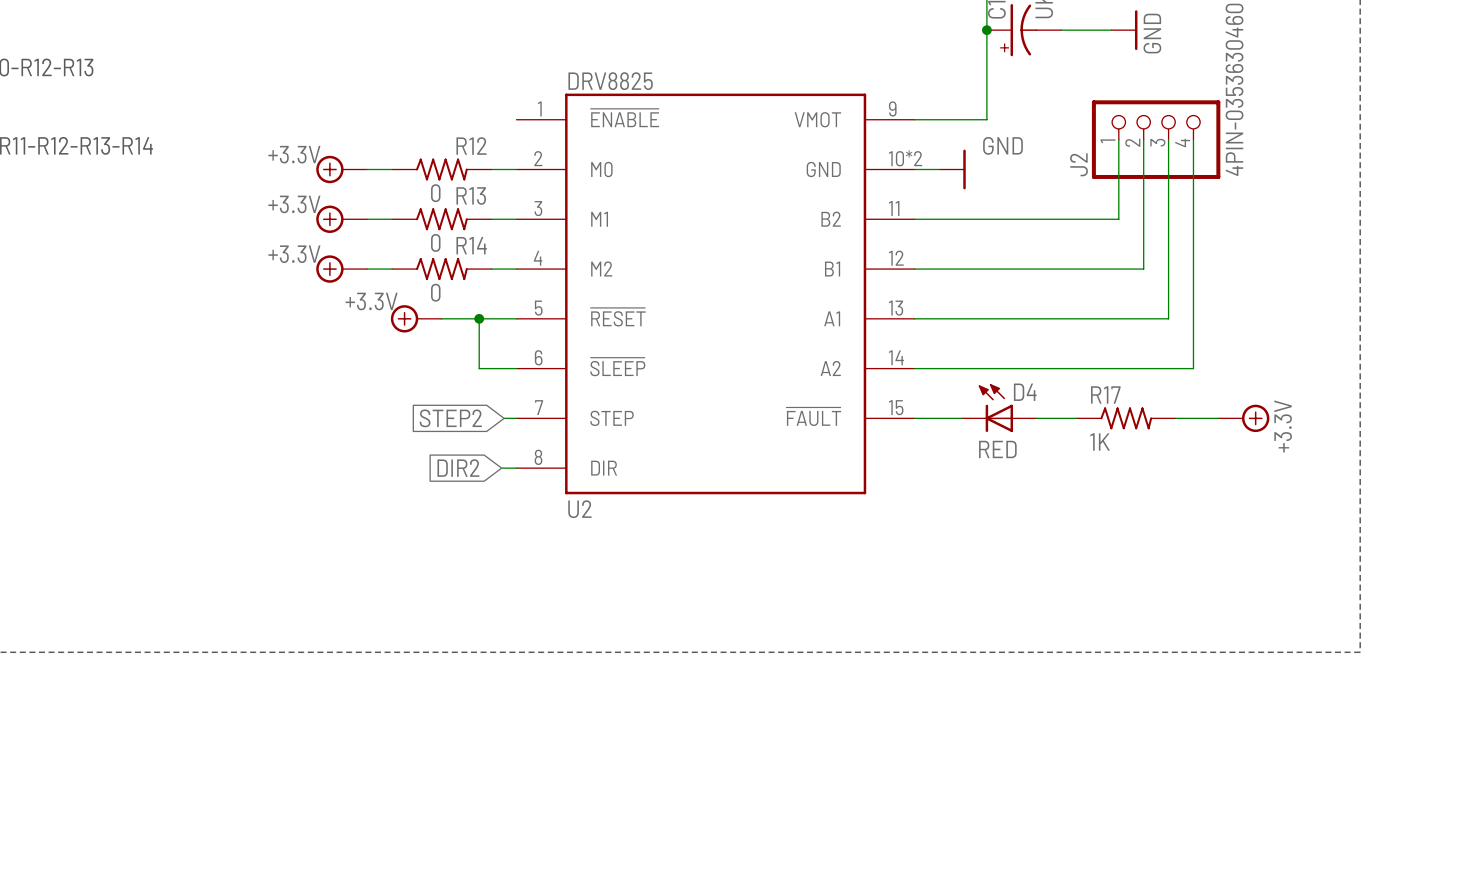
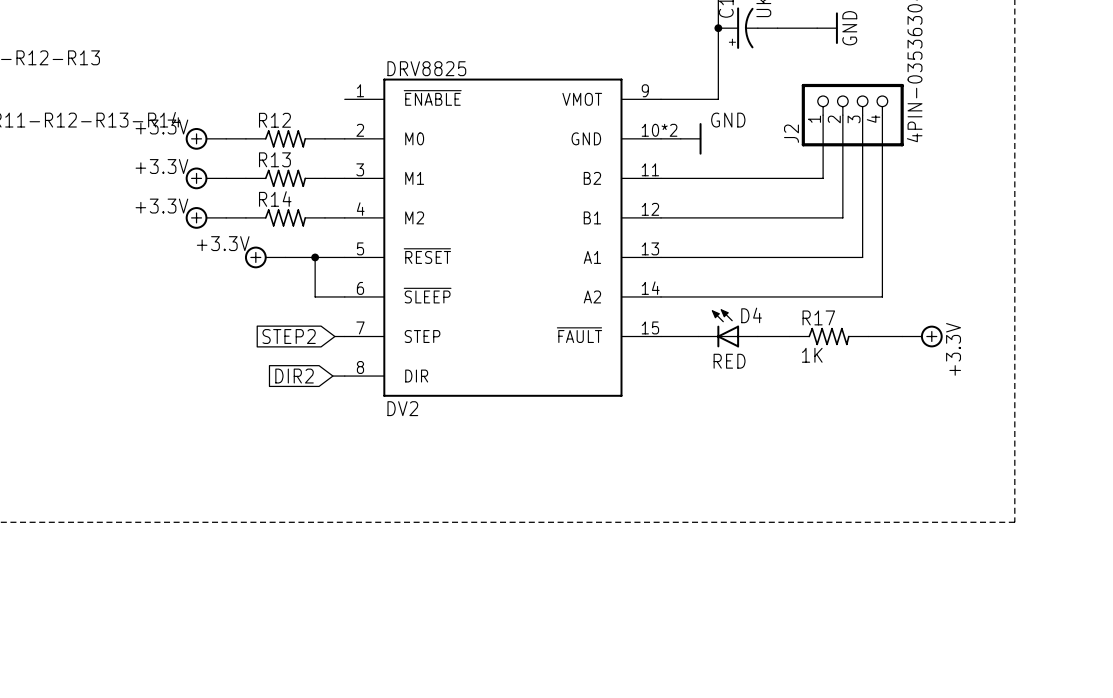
R12 name position: R12 (471, 146) -> R12 (274, 120)
R12 value: 0 (435, 193) -> none
R13 name position: R13 (471, 195) -> R13 (274, 159)
R13 value: 0 (435, 242) -> none
R14 name position: R14 (471, 245) -> R14 (275, 199)
R14 value: 0 (435, 292) -> none
U2 name: U2 (579, 509) -> DV2 (402, 408)

